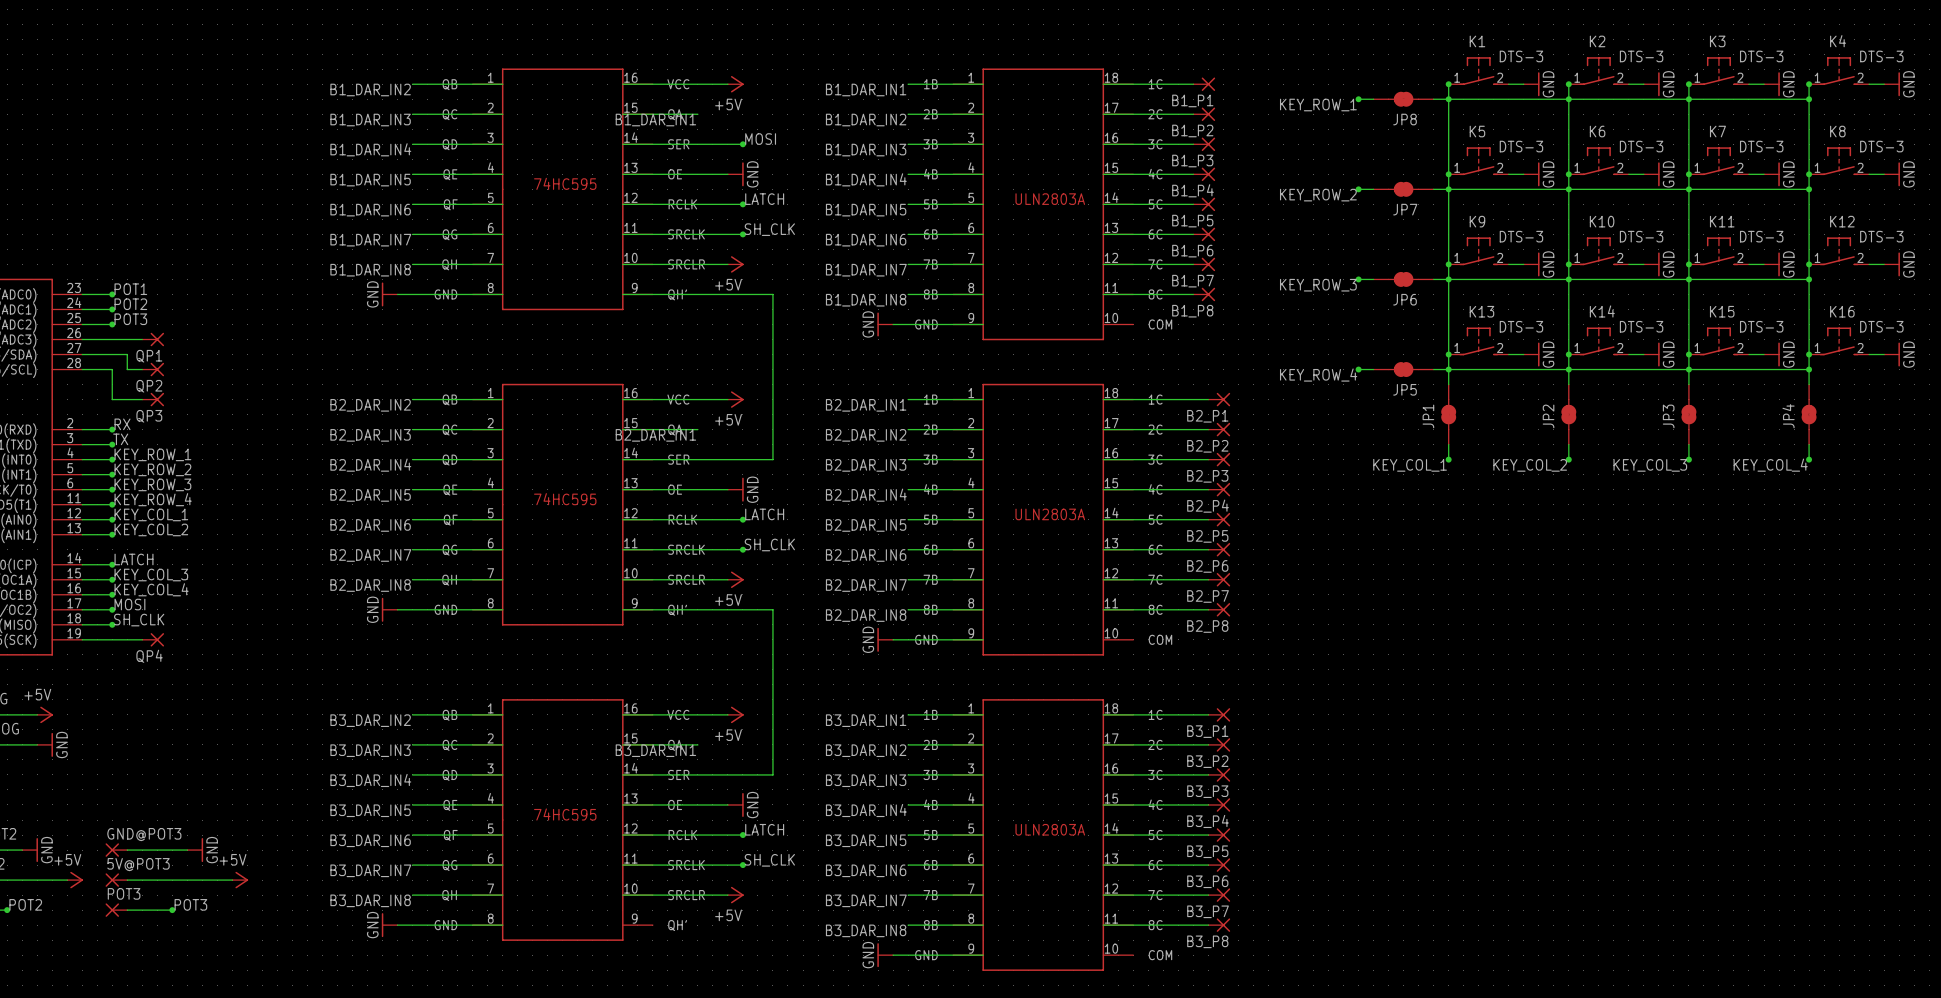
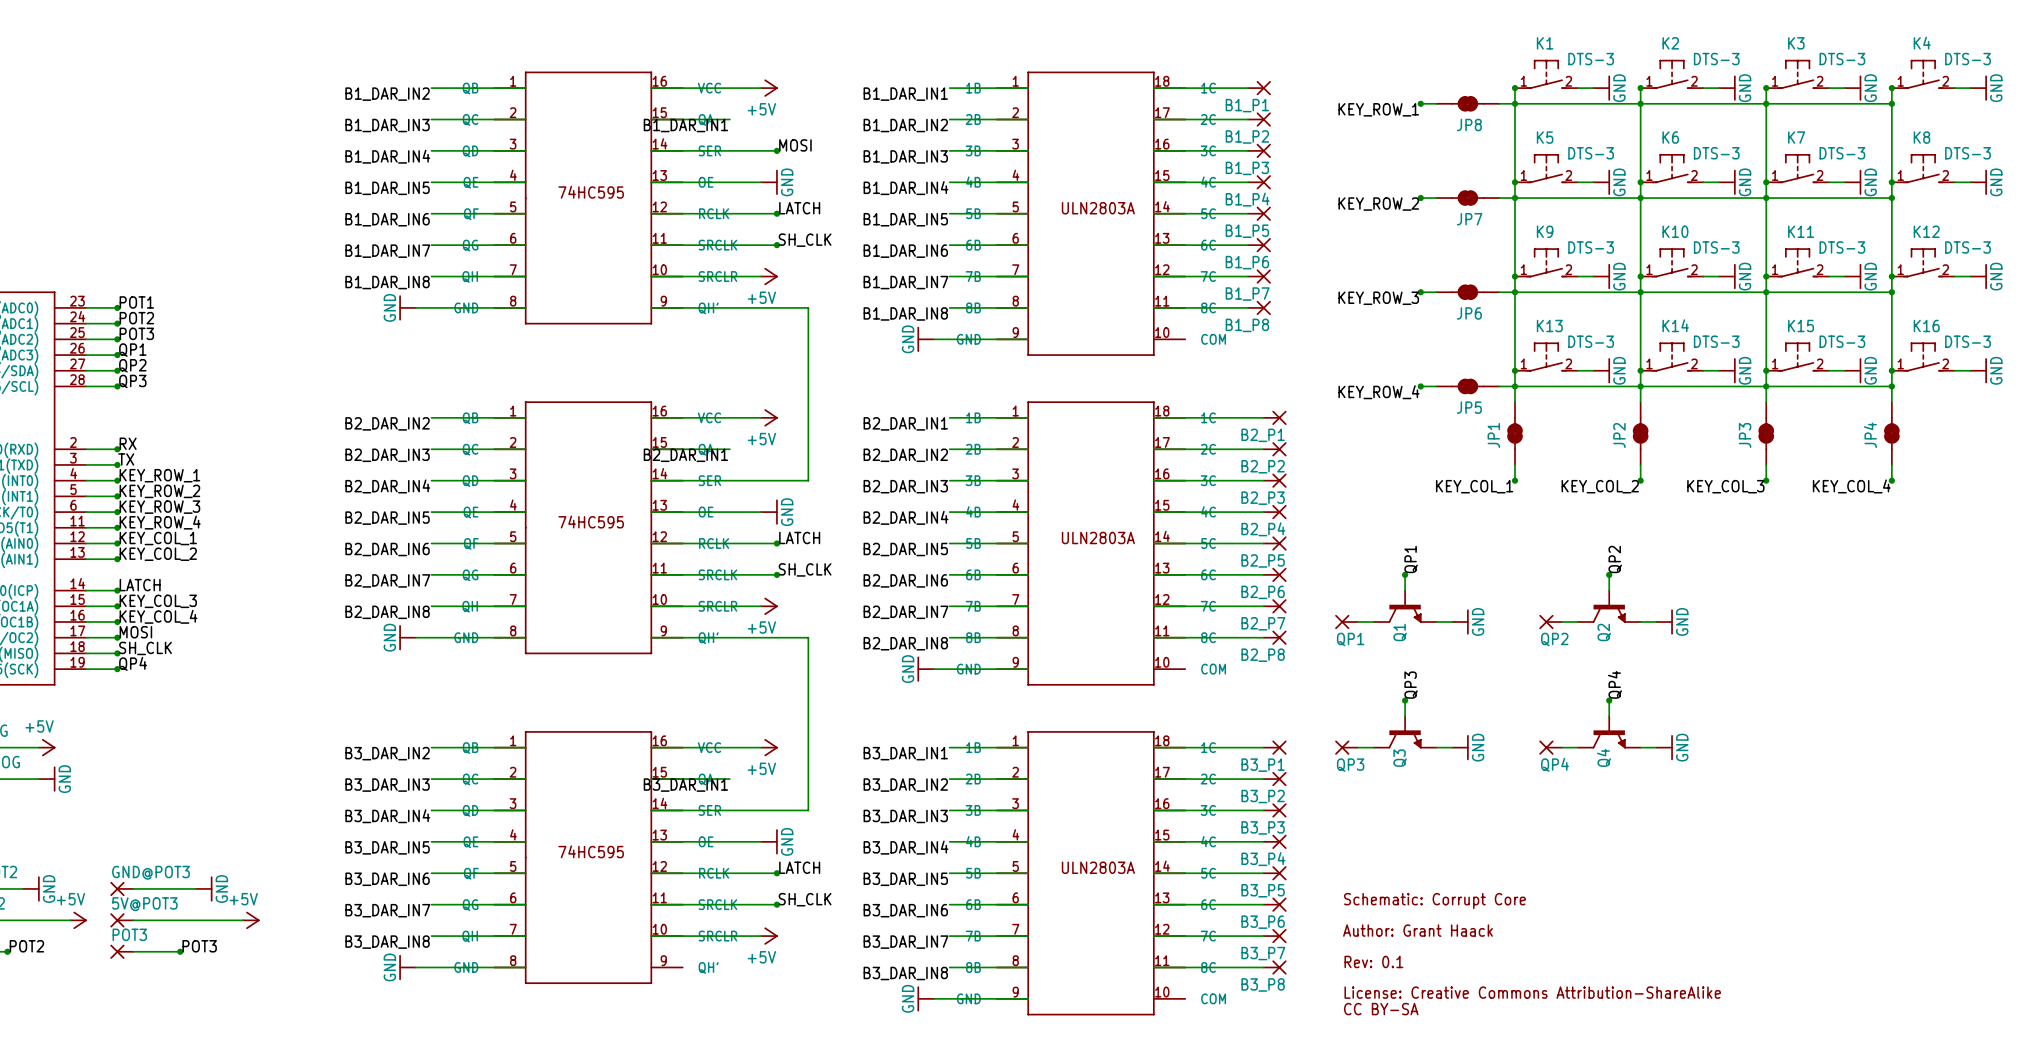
label: none -> QP1 (132, 350)
wire: (112, 339) (142, 339) -> none
junction: none -> (117, 355)
QP1 position: (153, 339) -> (1346, 622)
QP1 rotation: 0° (157, 339) -> 180° (1342, 622)
label: none -> QP2 (132, 365)
wire: (112, 354) (127, 354) (127, 369) (142, 369) -> none
junction: none -> (117, 370)
QP1 name position: QP1 (149, 356) -> QP1 (1350, 639)
label: none -> QP3 (132, 381)
wire: (112, 369) (112, 399) (142, 399) -> none
junction: none -> (117, 386)
QP2 position: (153, 369) -> (1550, 622)
QP2 rotation: 0° (157, 369) -> 180° (1546, 622)
QP2 name position: QP2 (149, 386) -> QP2 (1554, 639)
QP3 position: (153, 399) -> (1346, 747)
QP3 rotation: 0° (157, 399) -> 180° (1342, 747)
QP3 name position: QP3 (149, 416) -> QP3 (1350, 765)
label: none -> QP1 (1411, 559)
label: none -> QP2 (1615, 559)
wire: none -> (1405, 574) (1405, 590)
junction: none -> (1405, 574)
wire: none -> (1609, 574) (1609, 590)
junction: none -> (1609, 574)
Q1: none -> (1405, 606)
Q2: none -> (1609, 606)
wire: none -> (1357, 622) (1373, 622)
wire: none -> (1436, 622) (1452, 622)
power symbol: none -> GND (1460, 622)
wire: none -> (1562, 622) (1577, 622)
wire: none -> (1640, 622) (1656, 622)
power symbol: none -> GND (1664, 622)
label: none -> QP4 (133, 663)
wire: (112, 639) (142, 639) -> none
junction: none -> (117, 669)
QP4 position: (153, 639) -> (1550, 747)
QP4 rotation: 0° (157, 639) -> 180° (1546, 747)
label: none -> QP4 (1614, 684)
label: none -> QP3 (1411, 685)
QP4 name position: QP4 (149, 656) -> QP4 (1555, 764)
wire: none -> (1405, 700) (1405, 716)
junction: none -> (1405, 700)
wire: none -> (1609, 700) (1609, 716)
junction: none -> (1609, 700)
Q3: none -> (1405, 732)
Q4: none -> (1609, 732)
wire: none -> (1357, 747) (1373, 747)
wire: none -> (1436, 747) (1452, 747)
power symbol: none -> GND (1460, 747)
wire: none -> (1562, 747) (1577, 747)
wire: none -> (1640, 747) (1656, 747)
power symbol: none -> GND (1664, 747)
text: none -> Schematic: Corrupt Core (1434, 901)
text: none -> Author: Grant Haack (1417, 930)
text: none -> Rev: 0.1 (1373, 961)
text: none -> License: Creative Commons Attribution-ShareAlike (1532, 992)
text: none -> CC BY-SA (1381, 1009)

